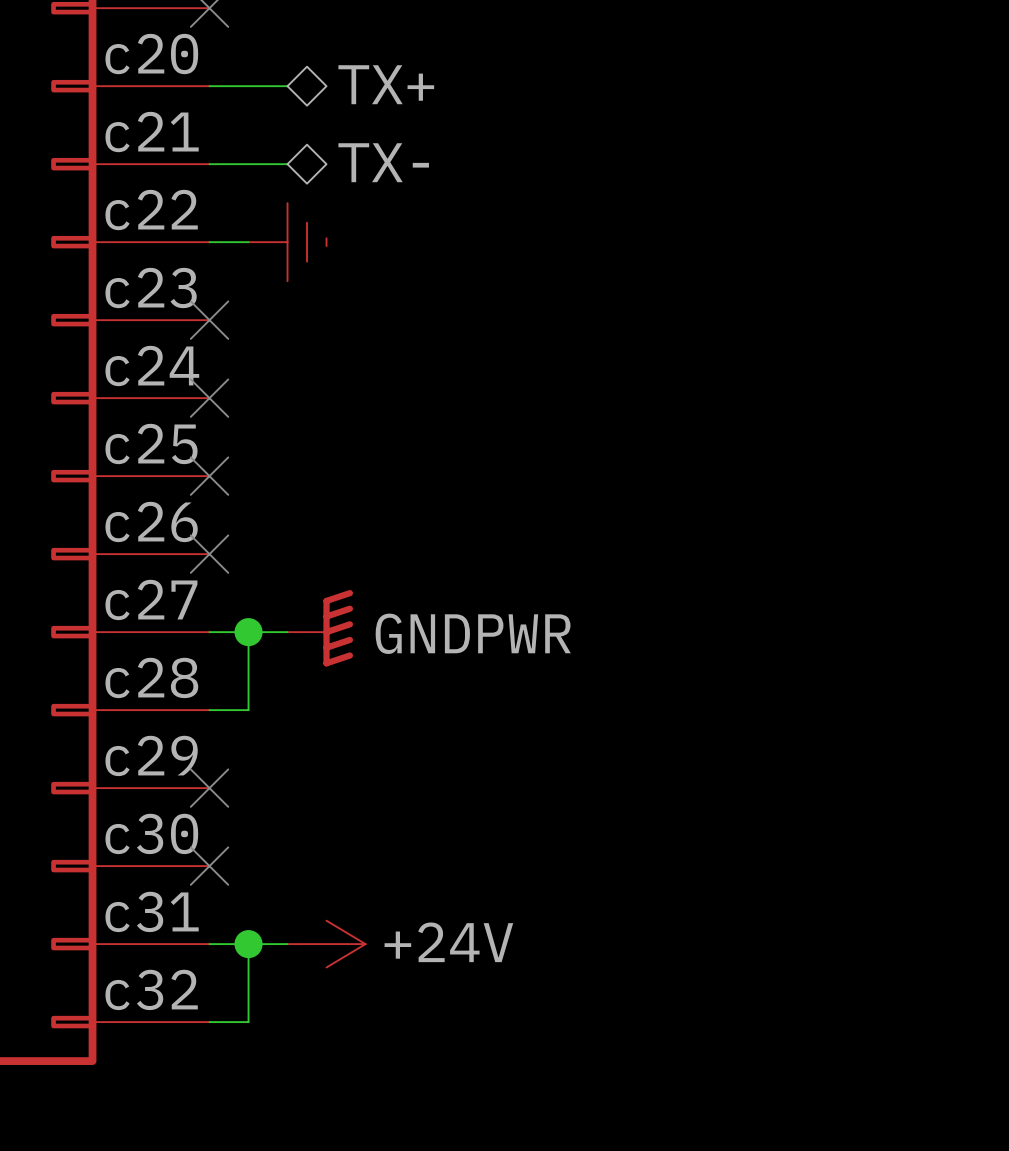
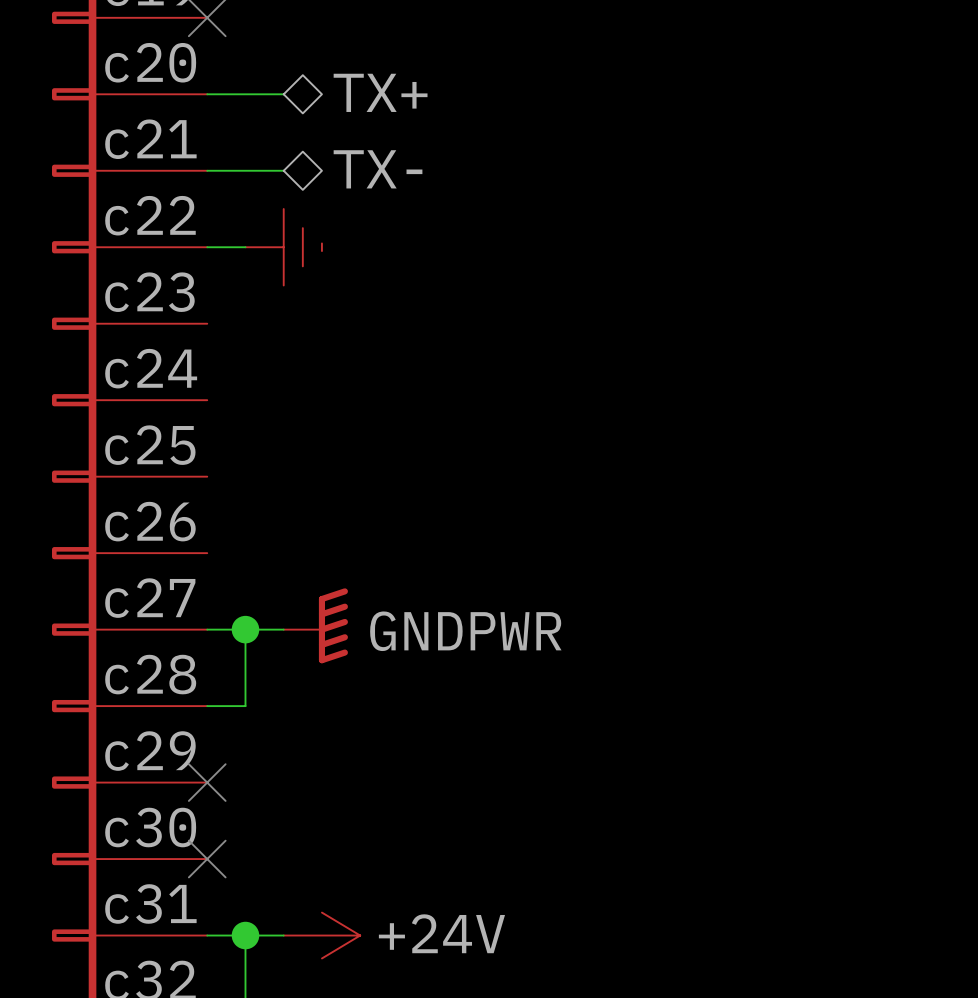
no-connect mark: (209, 320) -> none
no-connect mark: (209, 398) -> none
no-connect mark: (209, 476) -> none
no-connect mark: (209, 554) -> none

